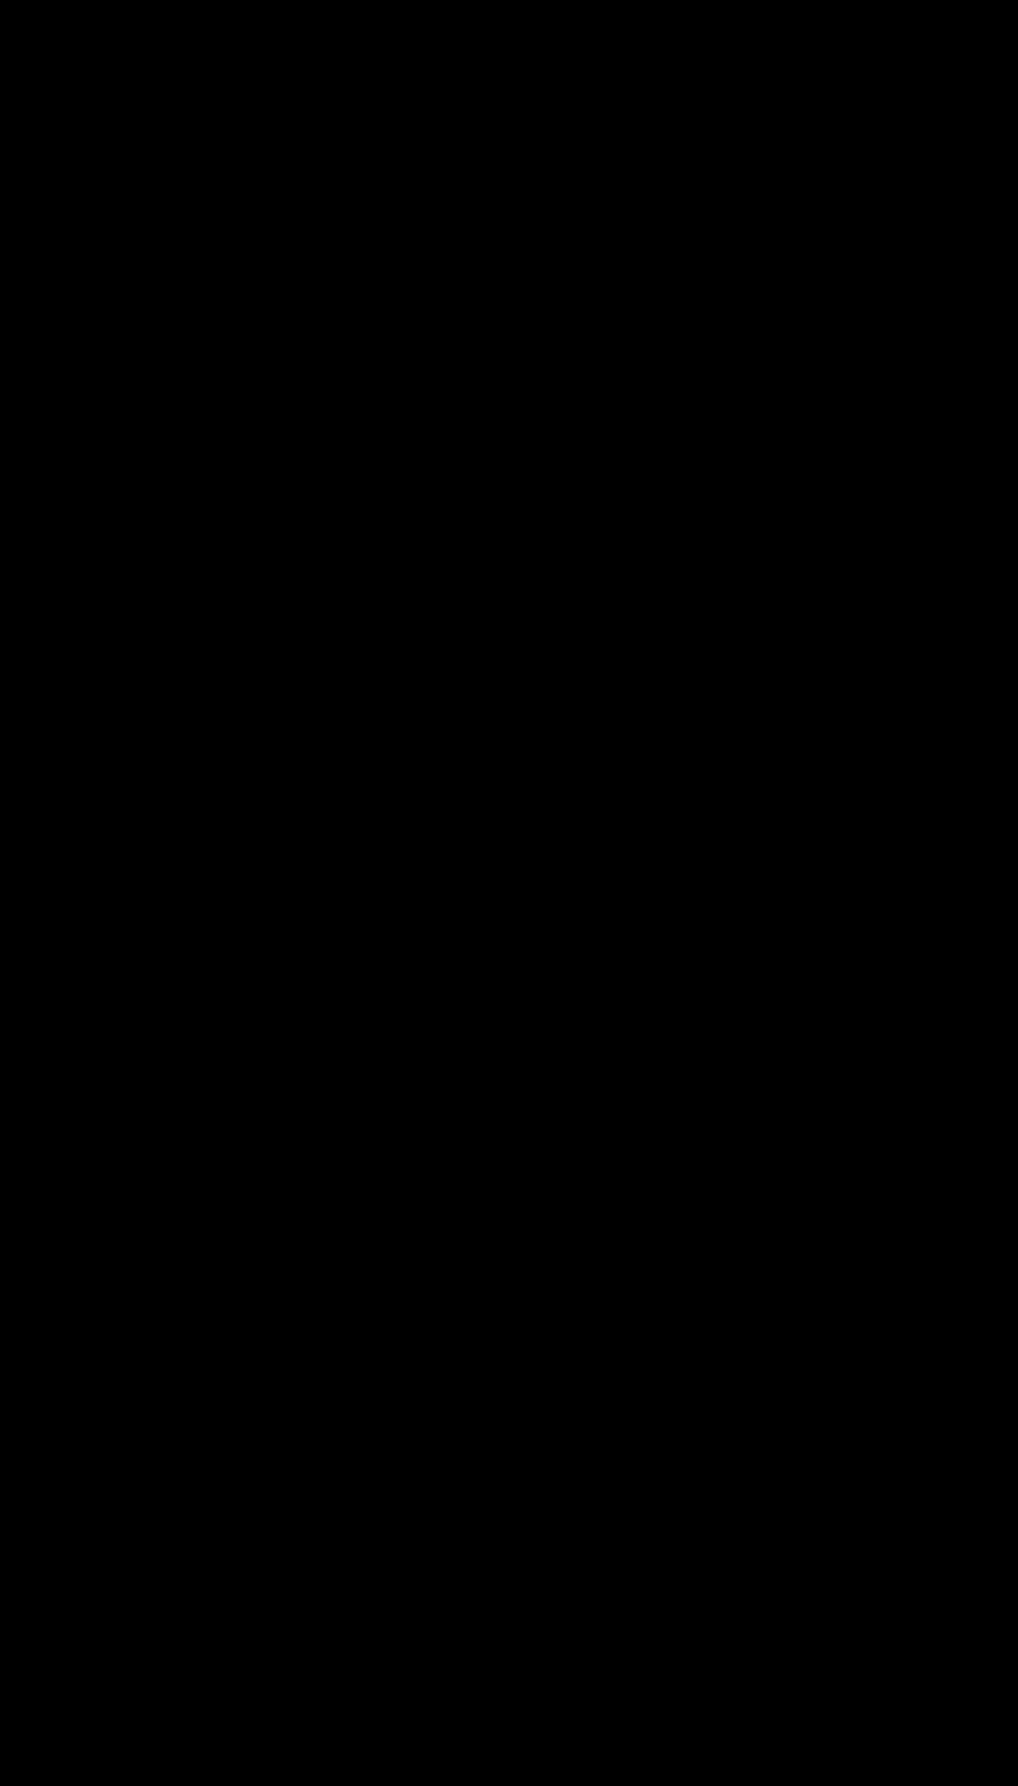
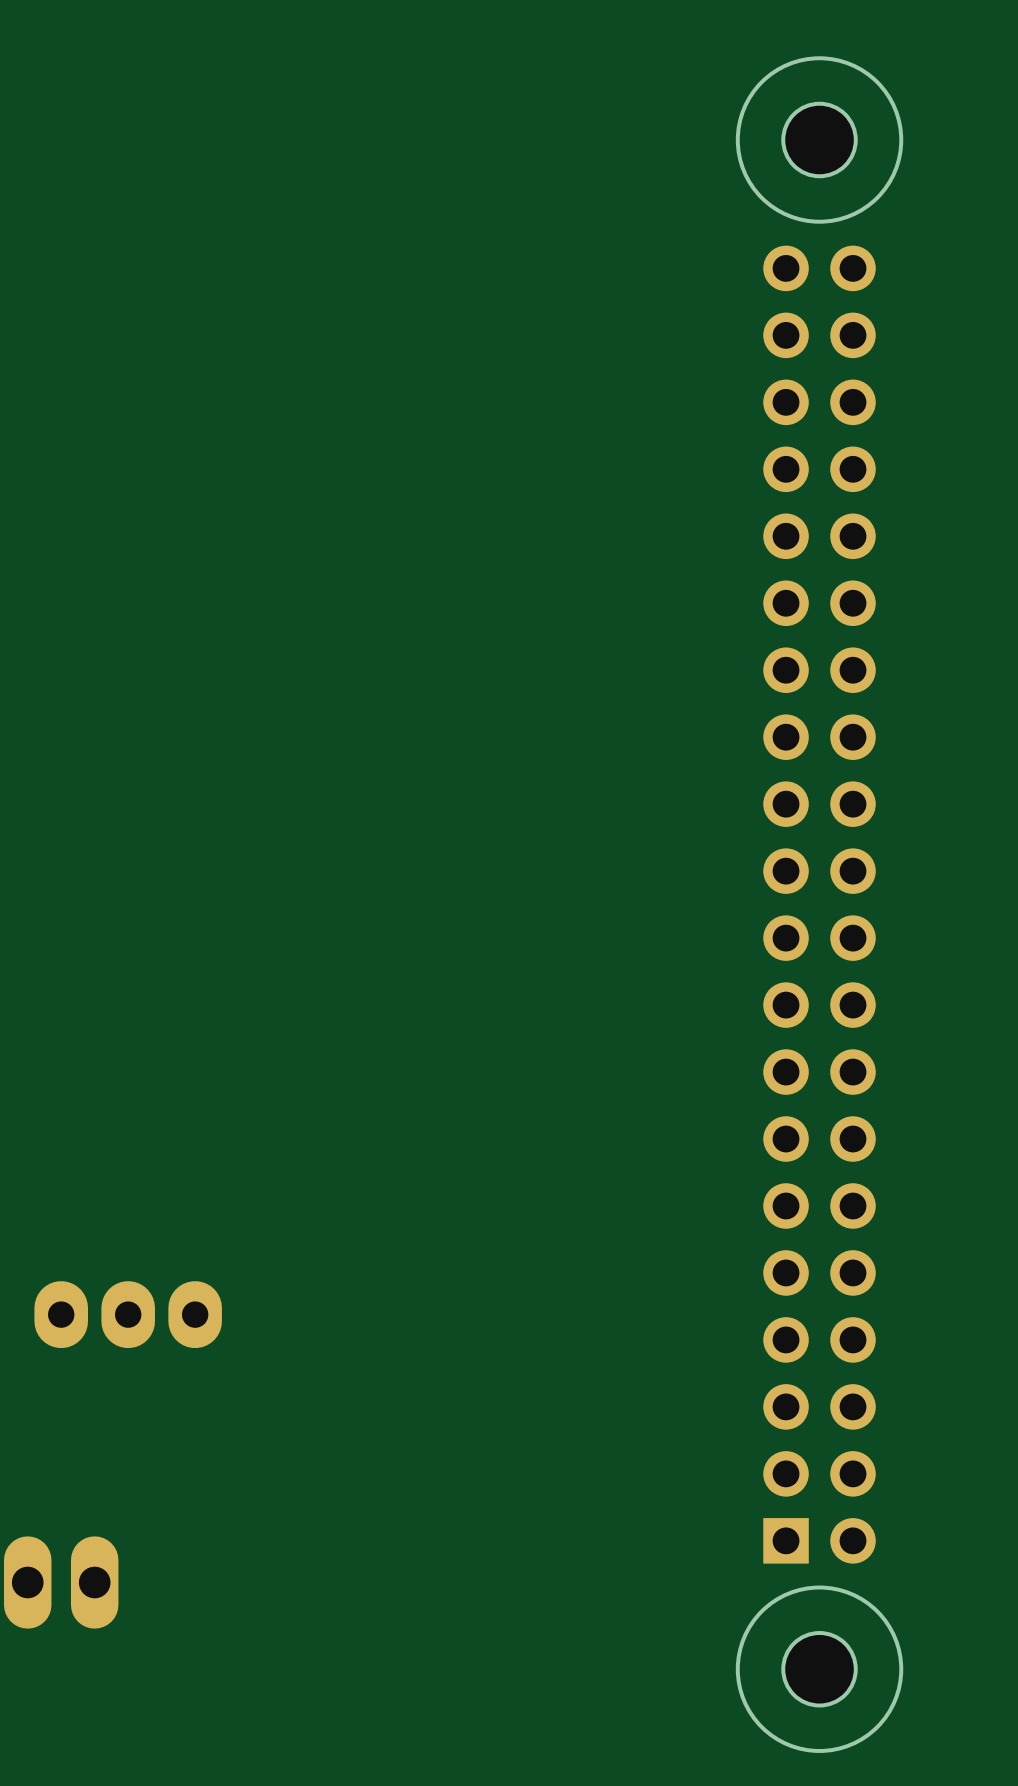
part: none -> (819, 139)
part: none -> (819, 904)
part: none -> (128, 1314)
part: none -> (61, 1582)
part: none -> (819, 1669)

